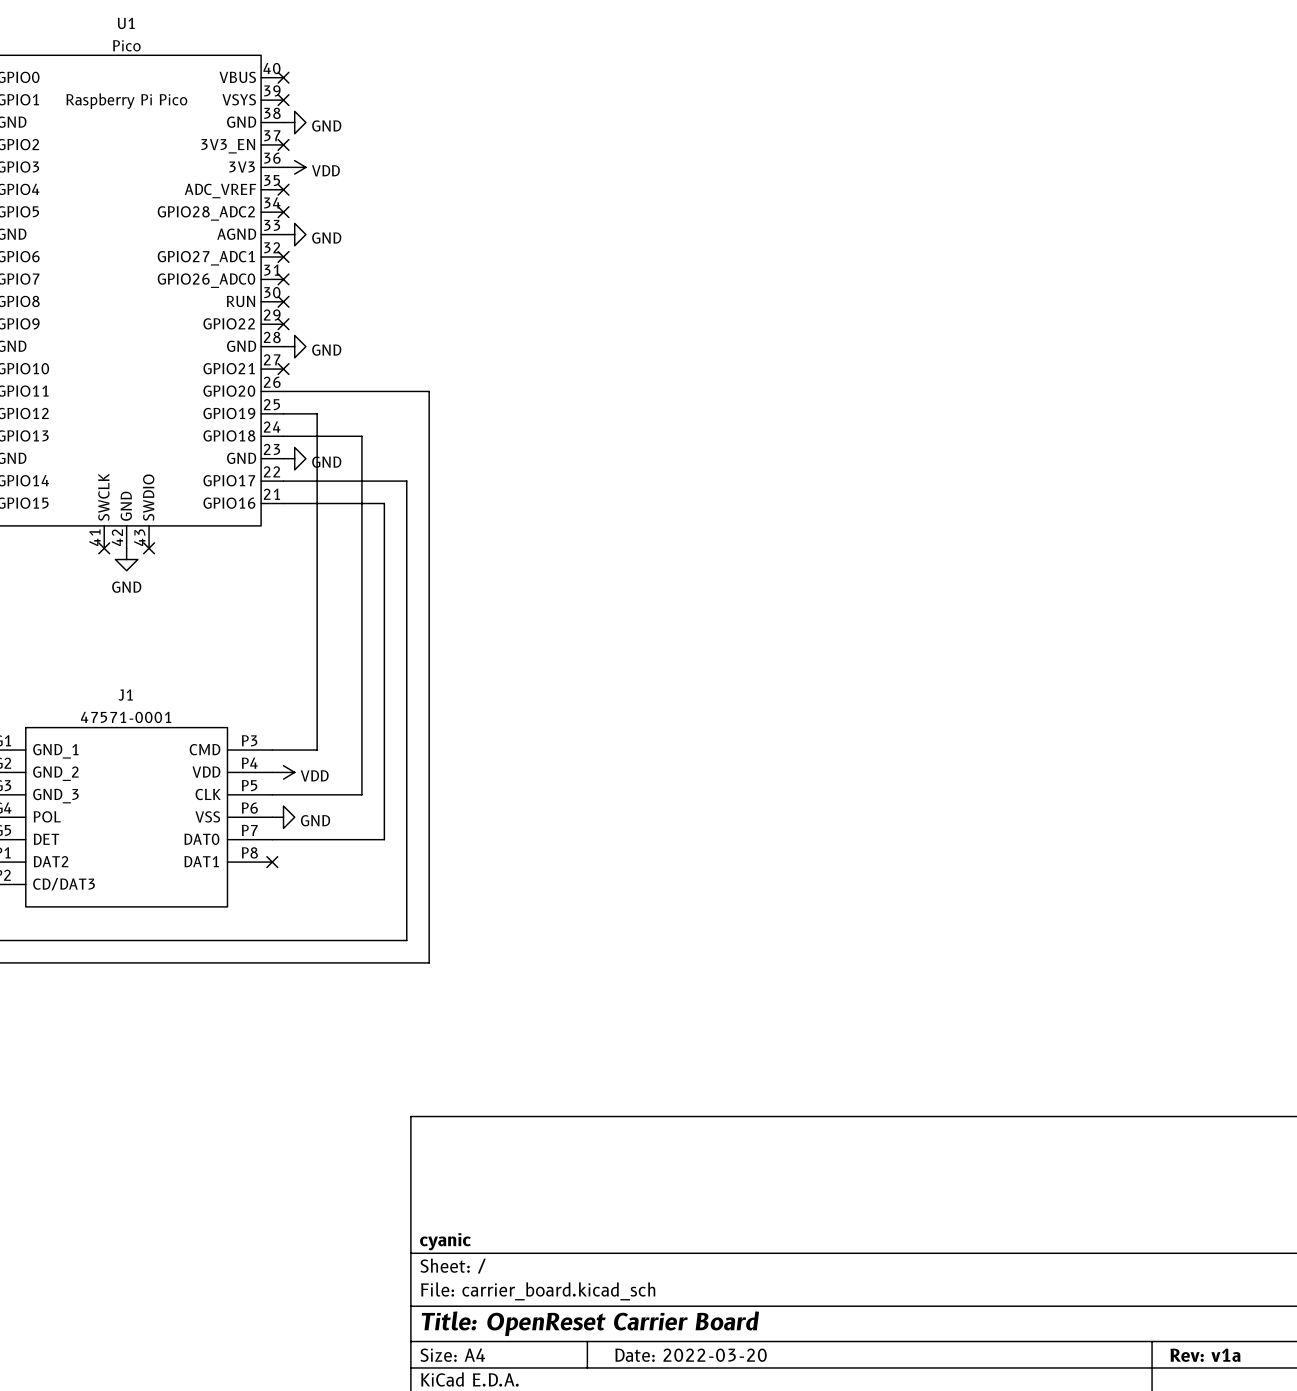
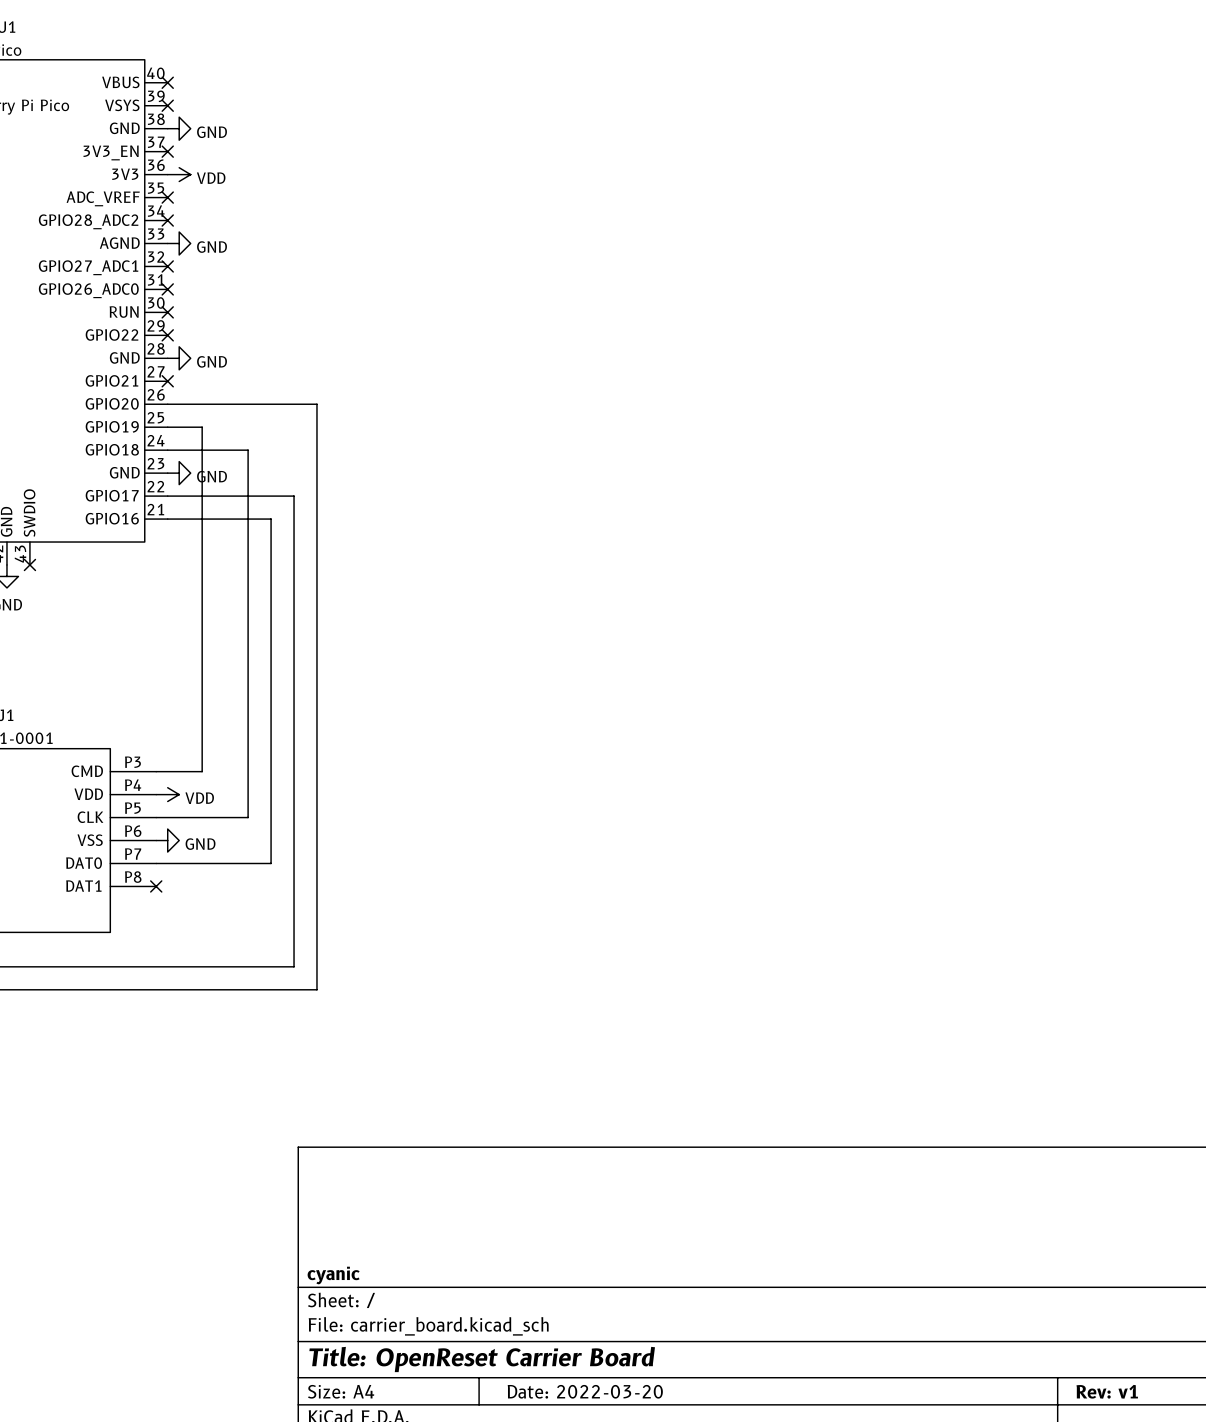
title block: Rev: v1a (1205, 1355) -> Rev: v1 (1107, 1391)

